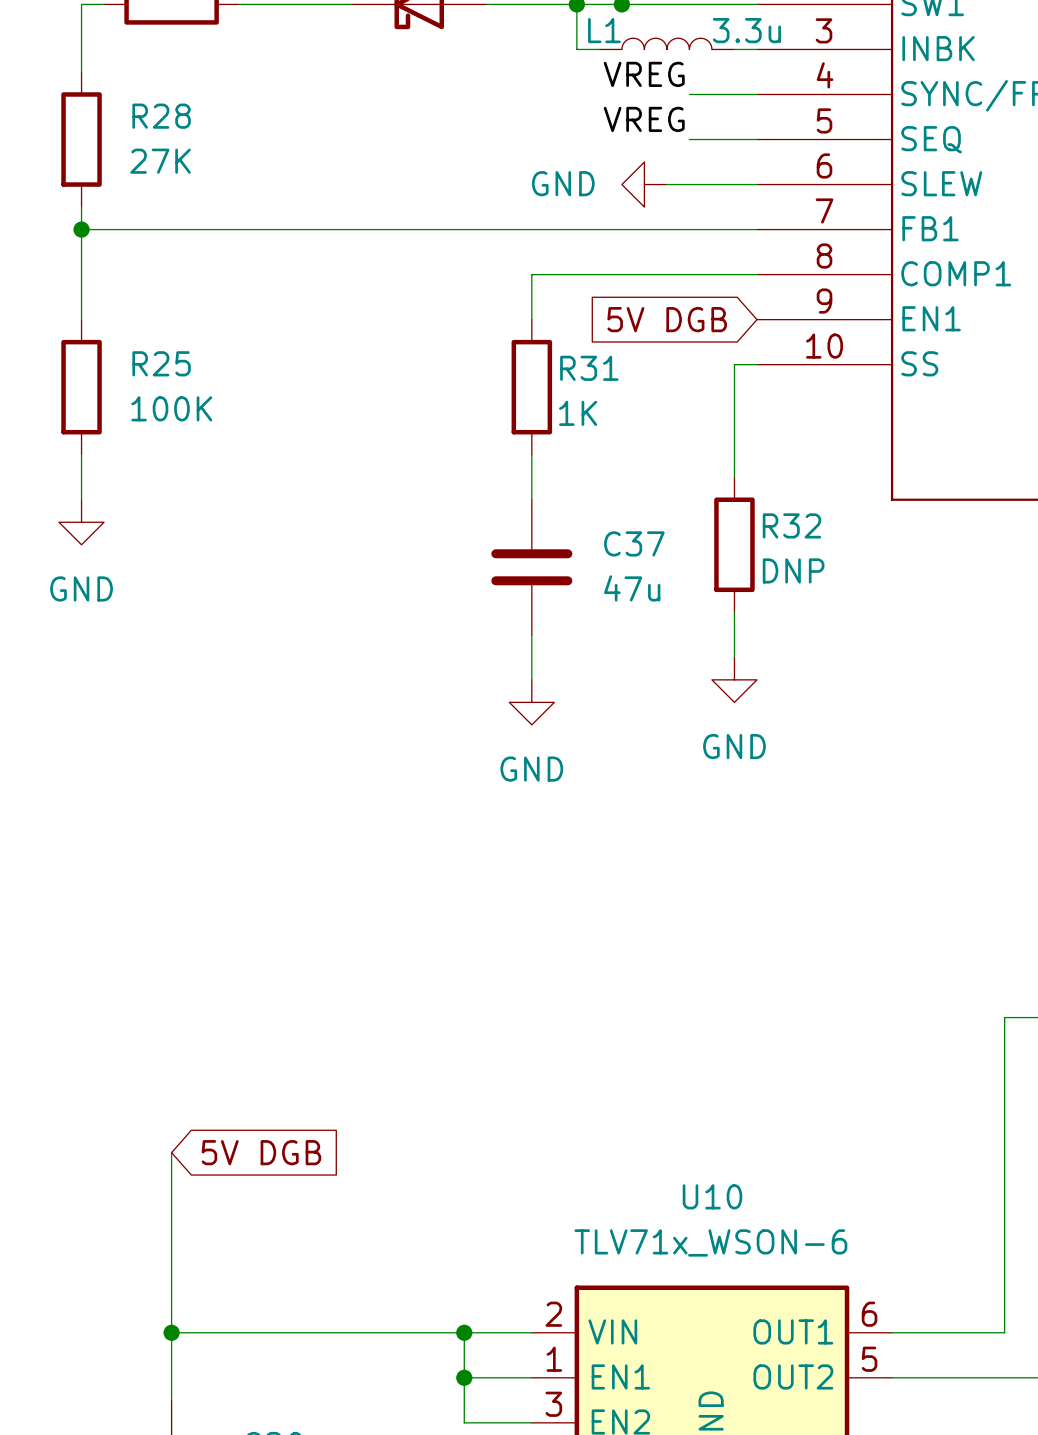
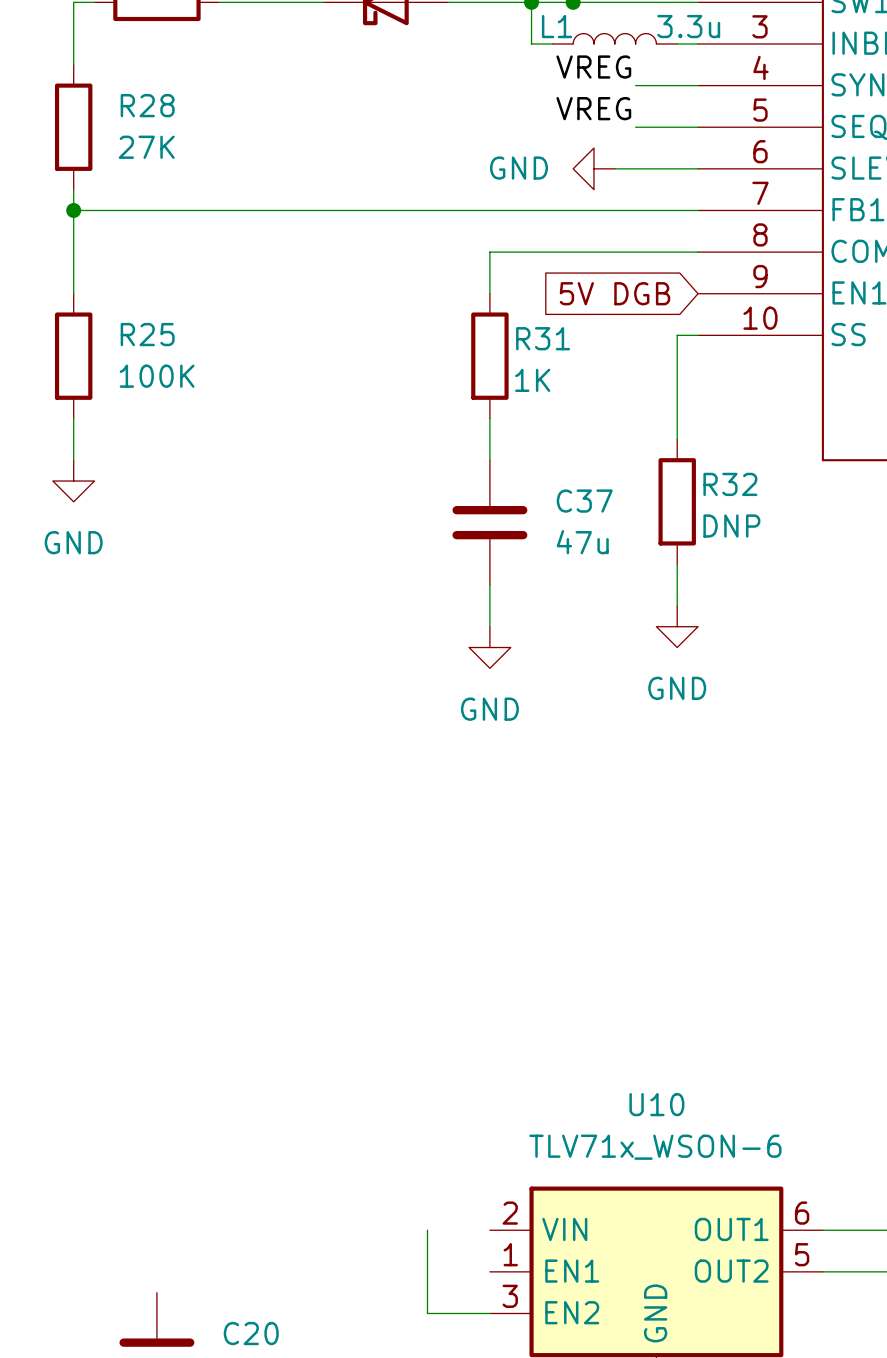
wire: (171, 1152) (171, 1400) -> none
global label: 5V DGB (261, 1152) -> none
wire: (171, 1332) (531, 1332) -> none
junction: (171, 1332) -> none
junction: (464, 1332) -> none
wire: (464, 1377) (531, 1377) -> none
junction: (464, 1377) -> none

